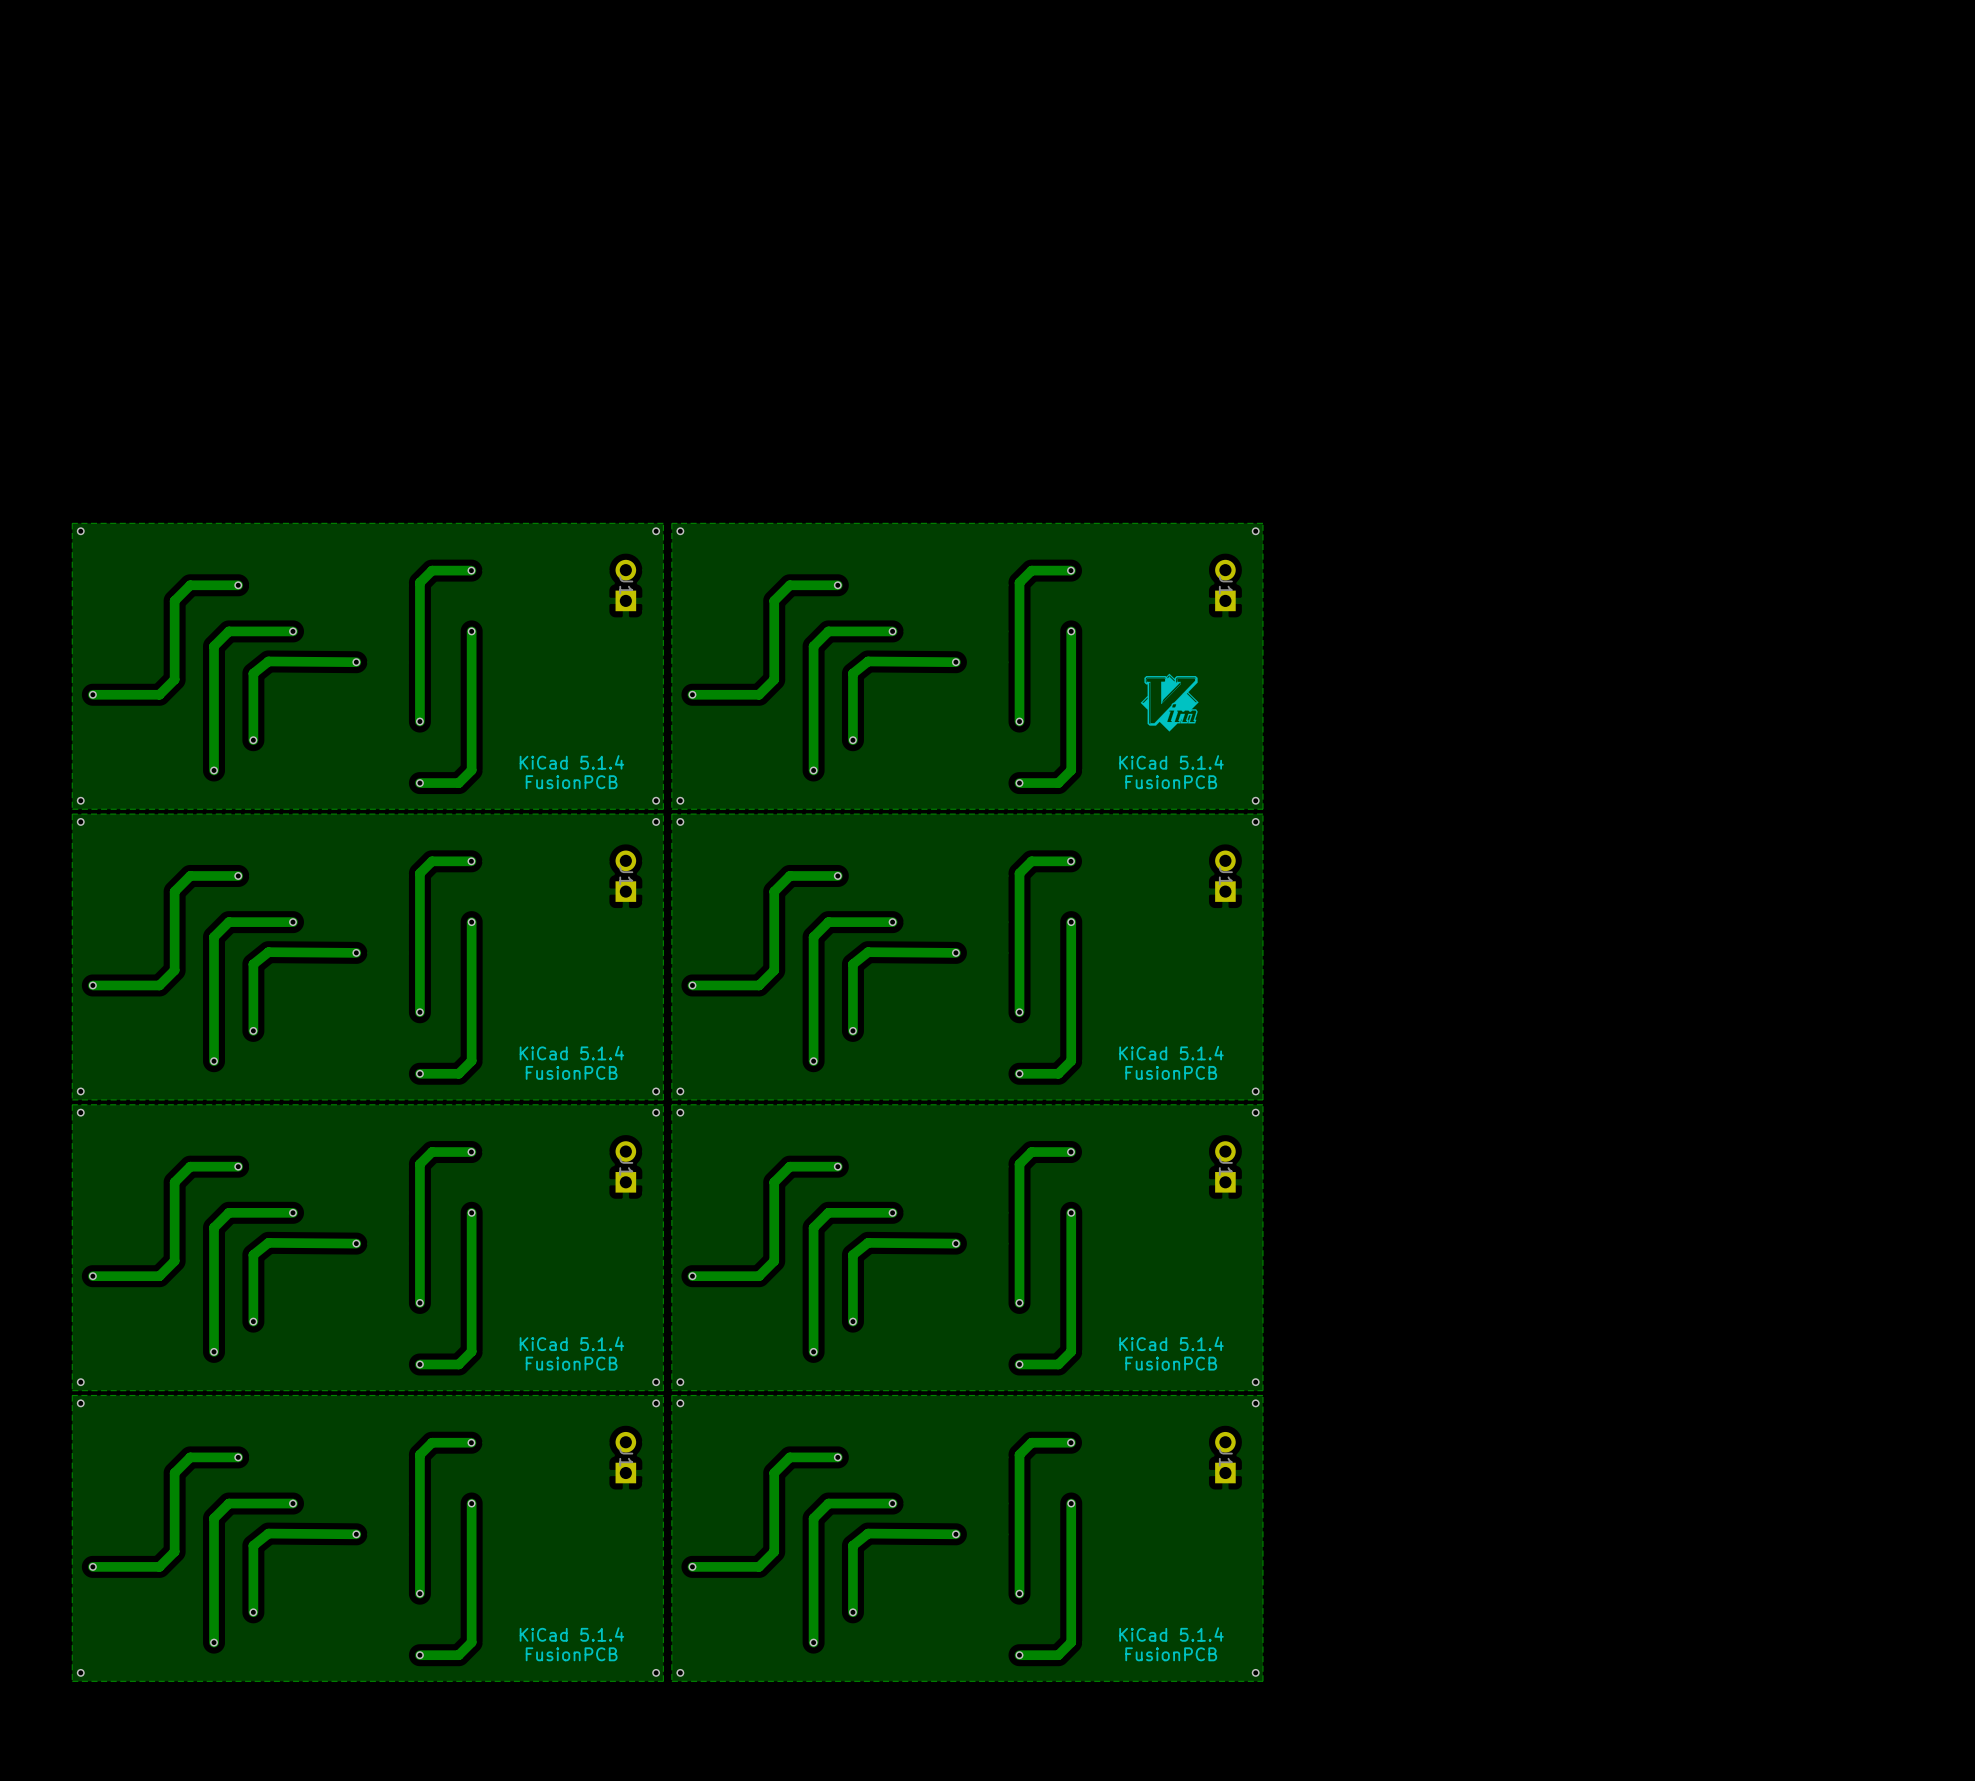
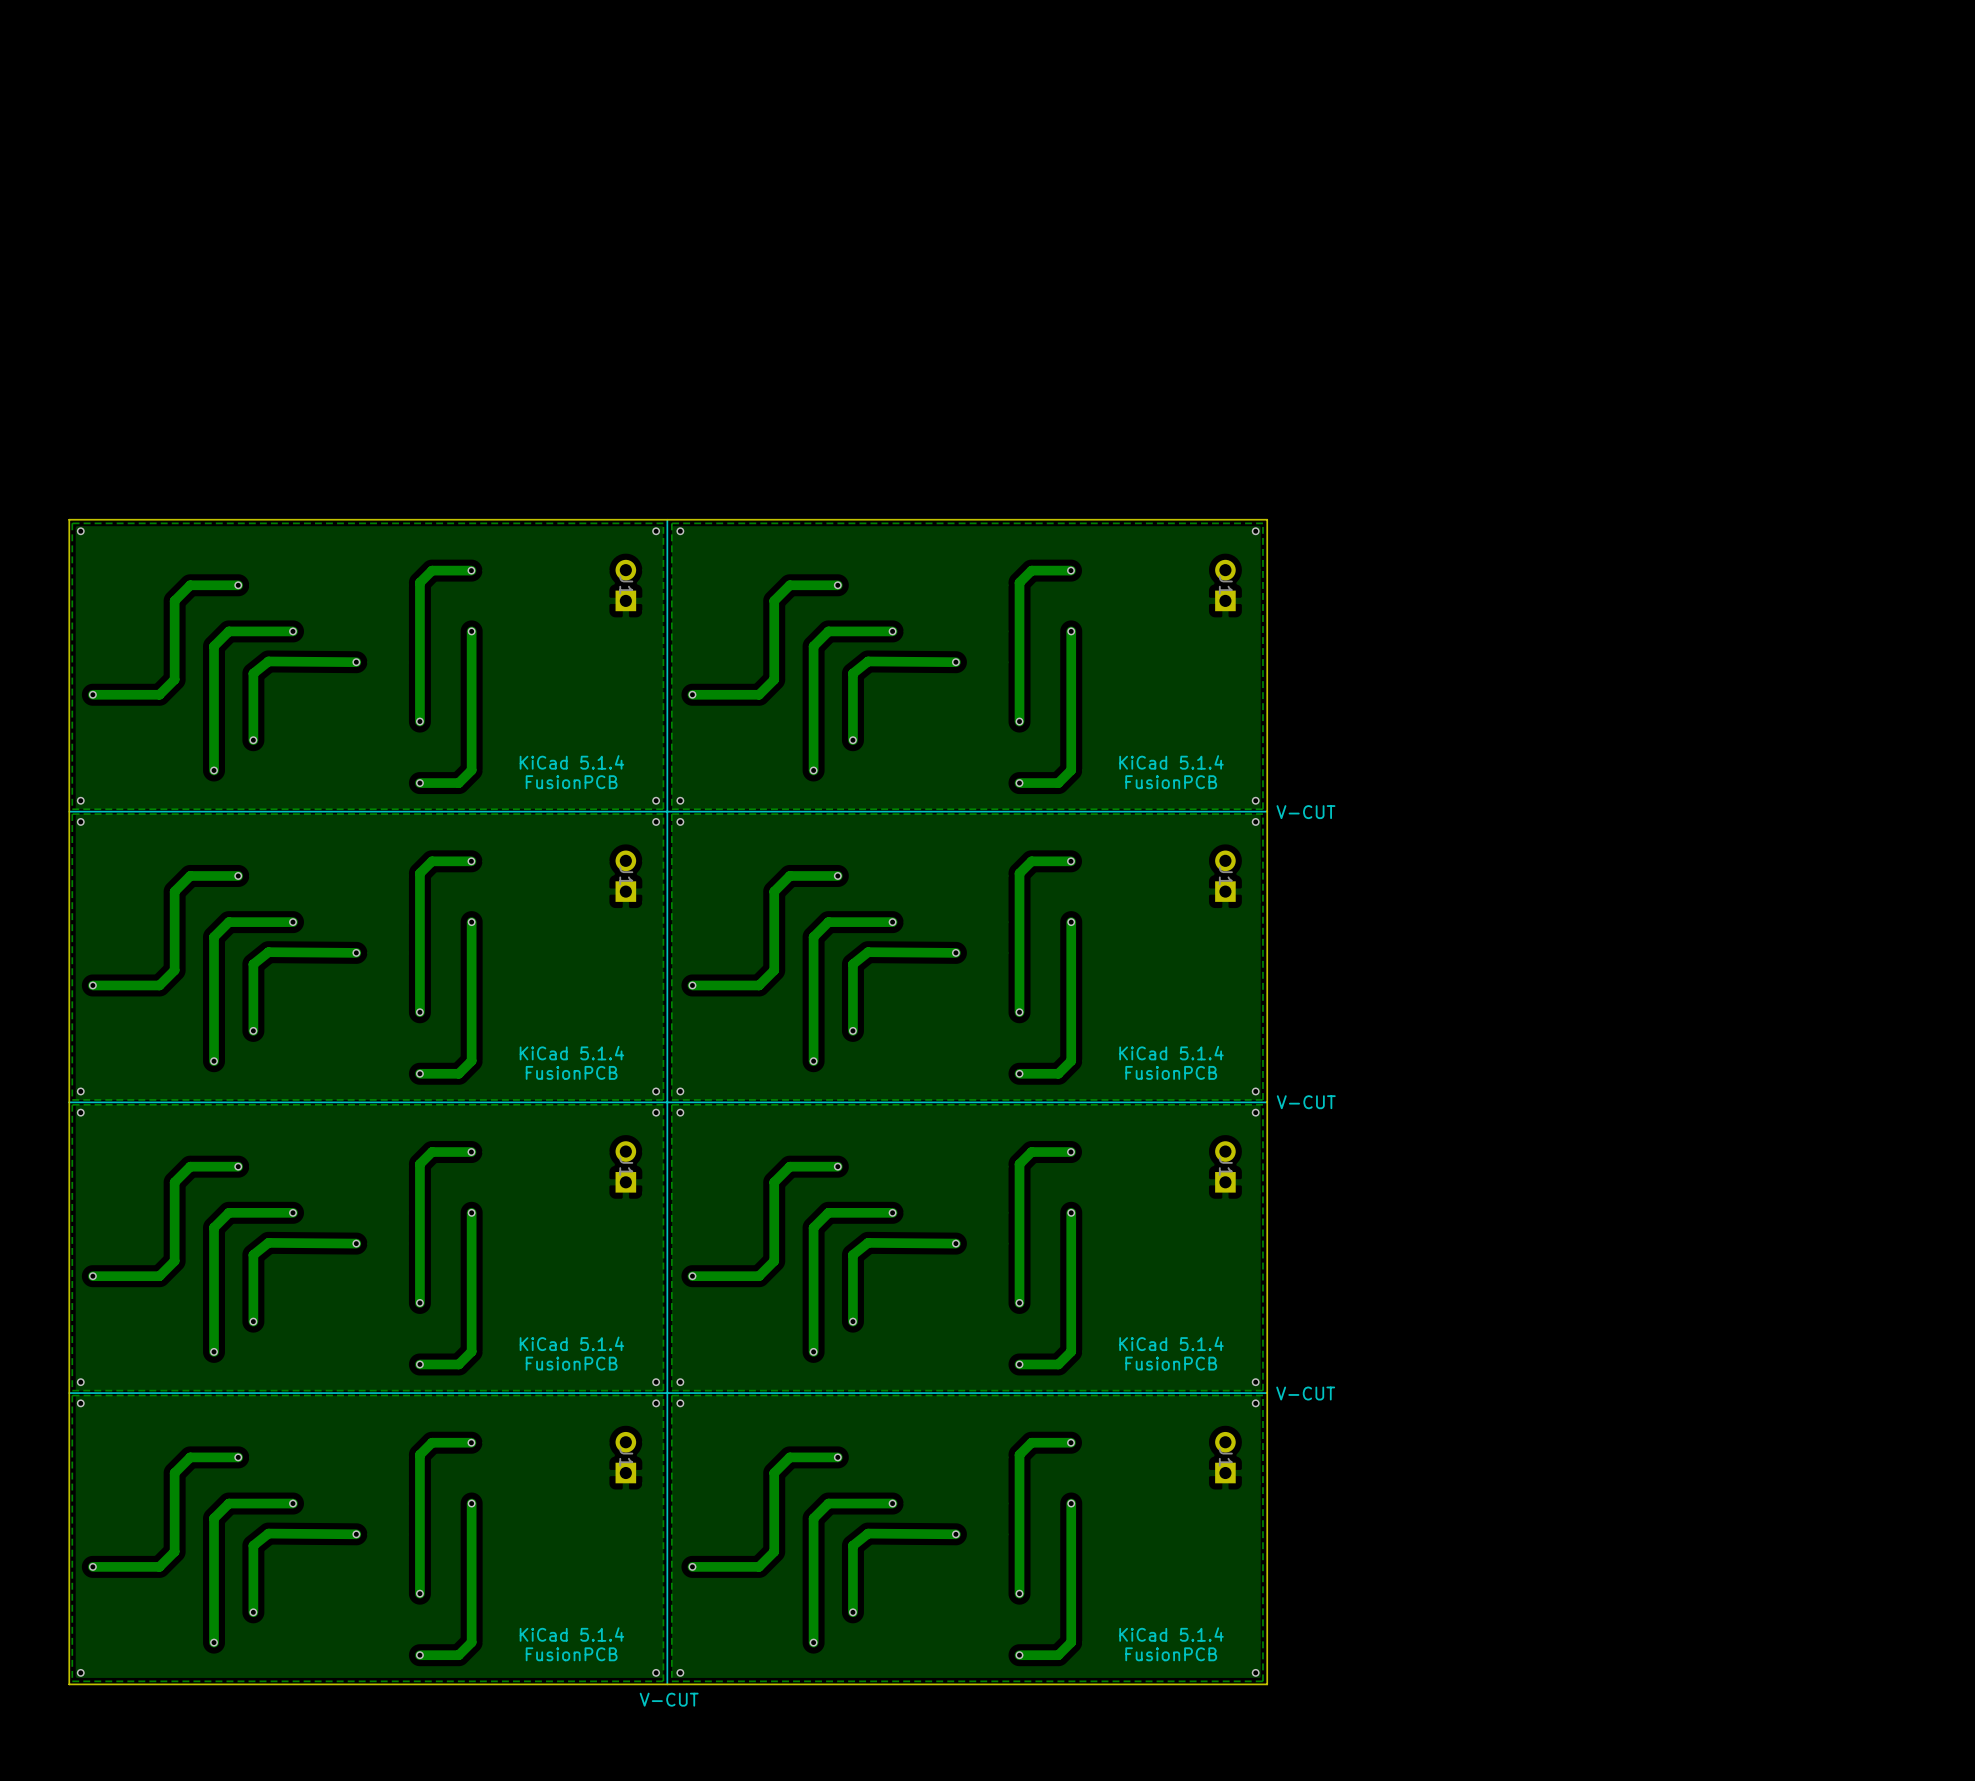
line: none -> (667, 519) (667, 1684)
board edge: none -> (1267, 519) (1267, 1684) (69, 1684) (69, 519) (1267, 519)
drawing: [1140, 673, 1199, 732] -> none
line: none -> (1267, 811) (69, 811)
text: none -> V-CUT (1305, 812)
line: none -> (1267, 1102) (68, 1102)
text: none -> V-CUT (1306, 1102)
line: none -> (1267, 1393) (69, 1393)
text: none -> V-CUT (1305, 1393)
text: none -> V-CUT (669, 1699)

